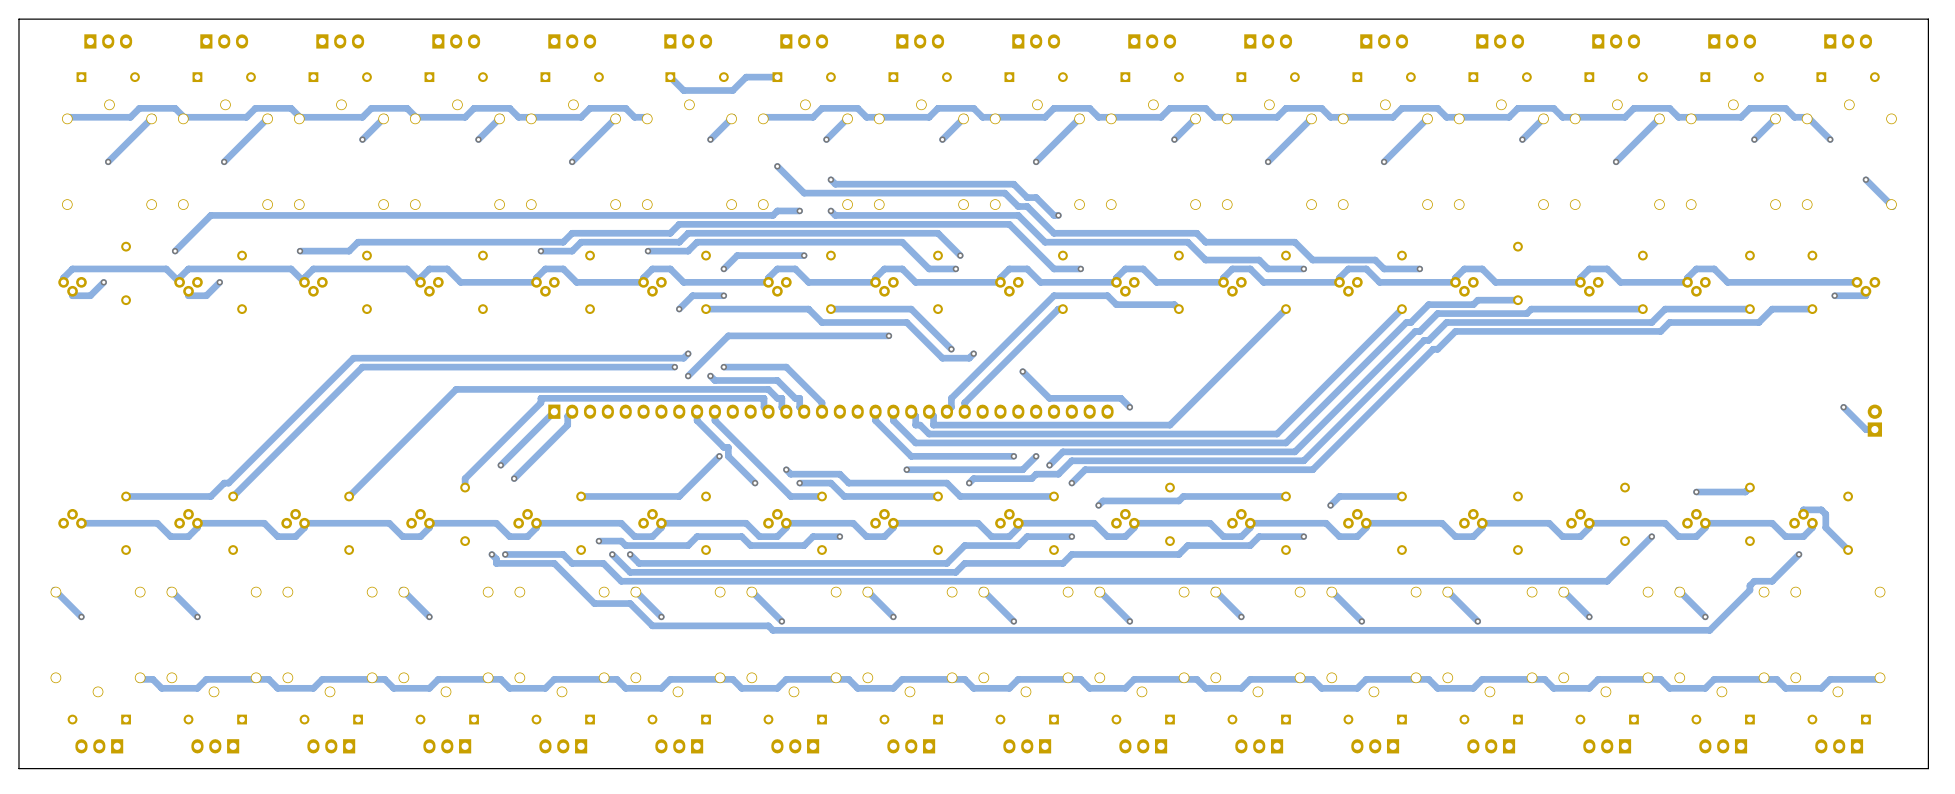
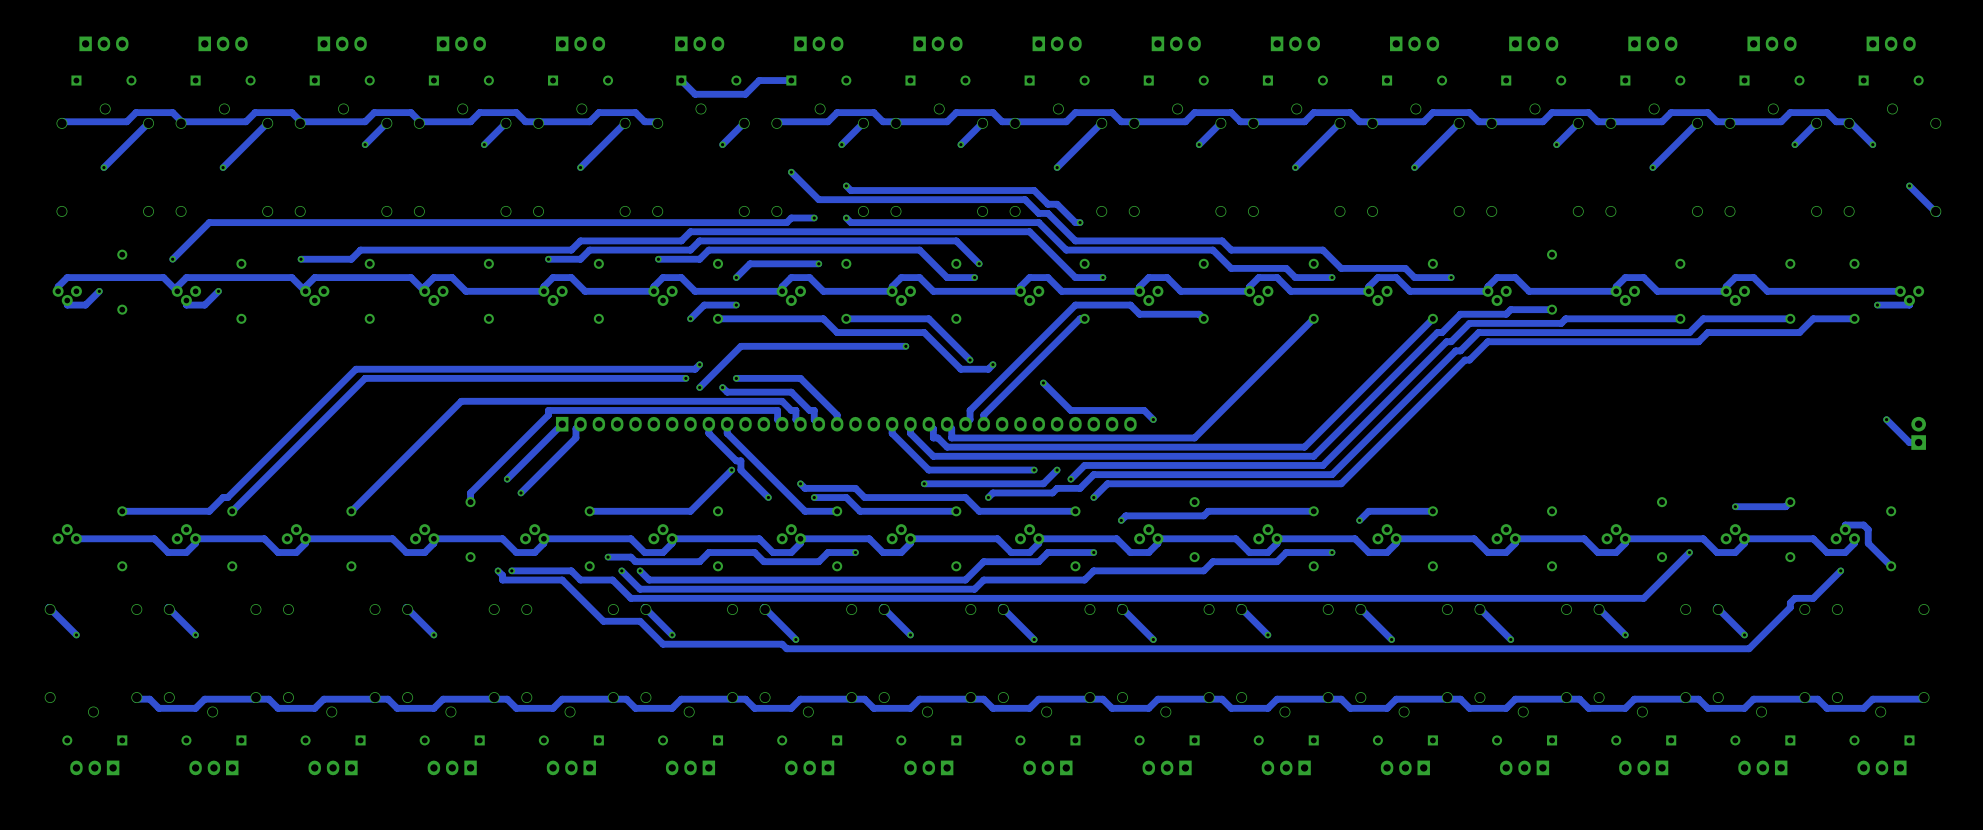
board edge: (1928, 19) (1928, 768) (19, 768) (19, 19) (1928, 19) -> none

